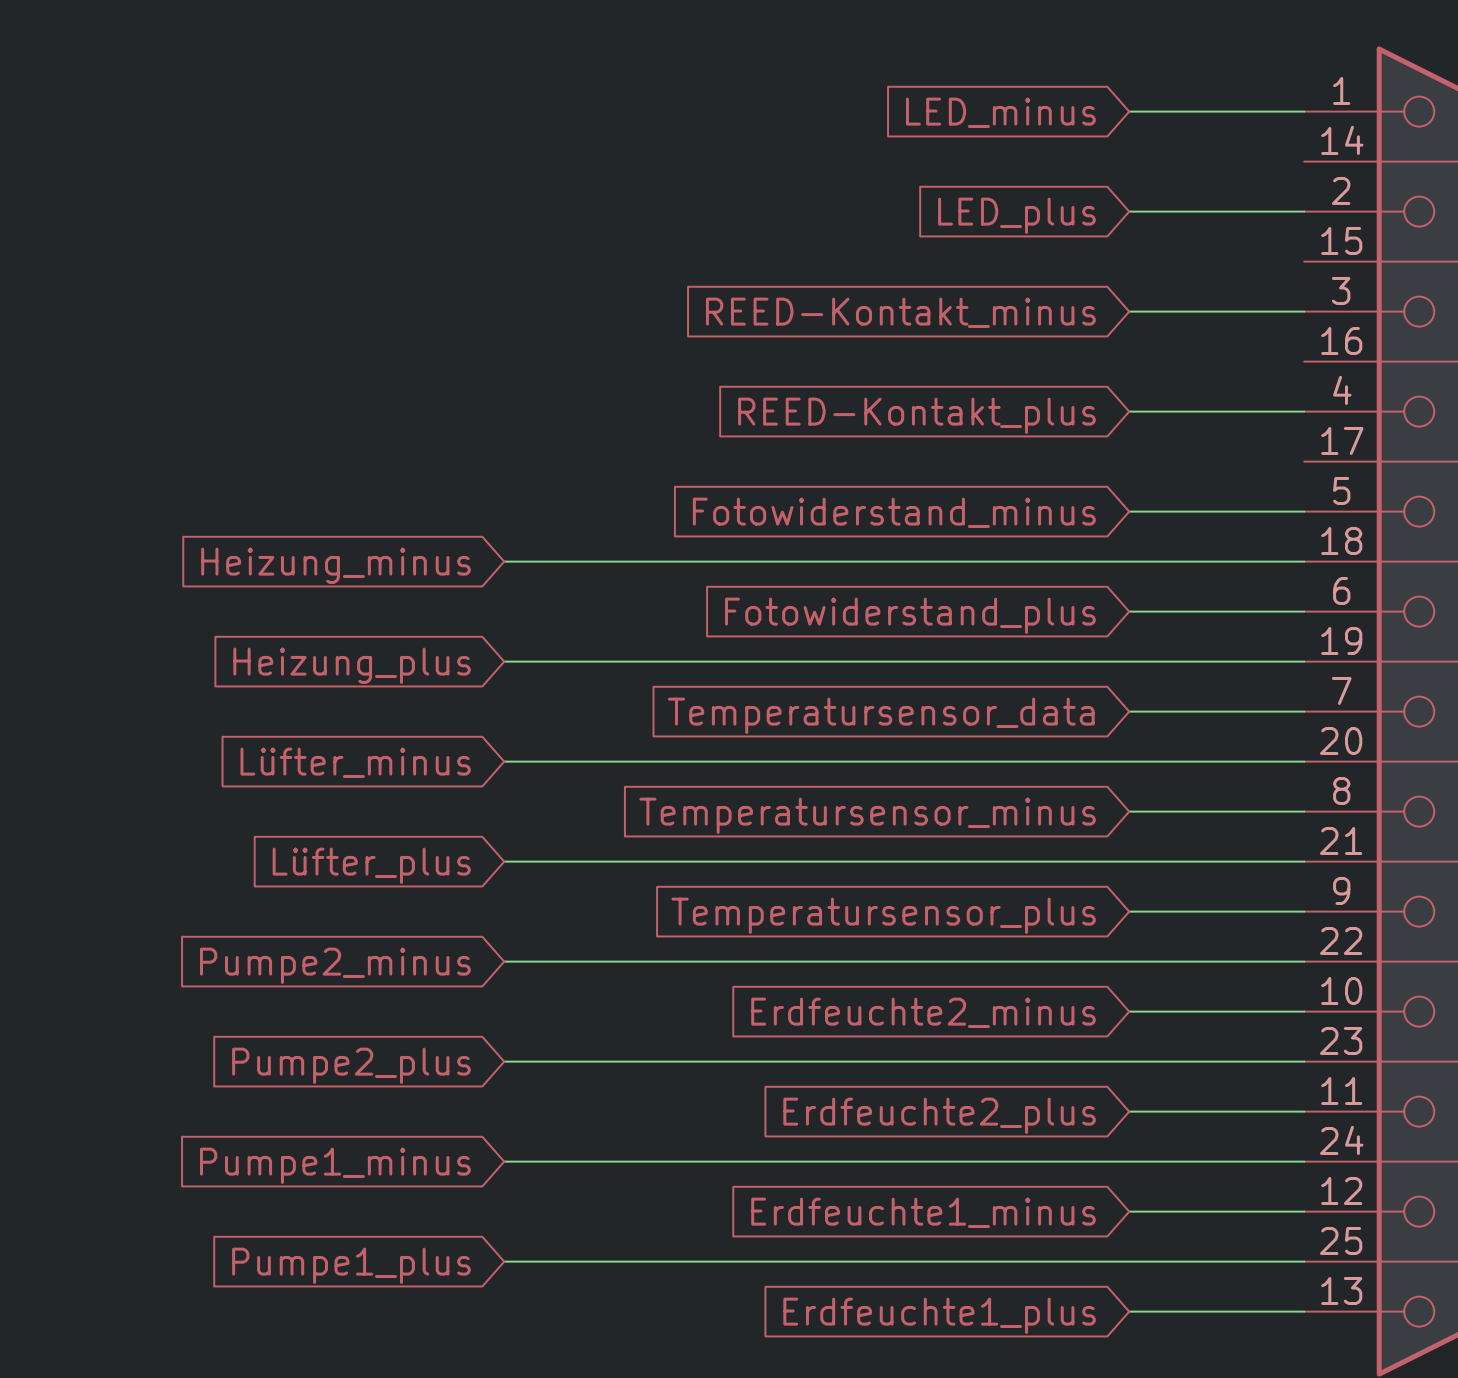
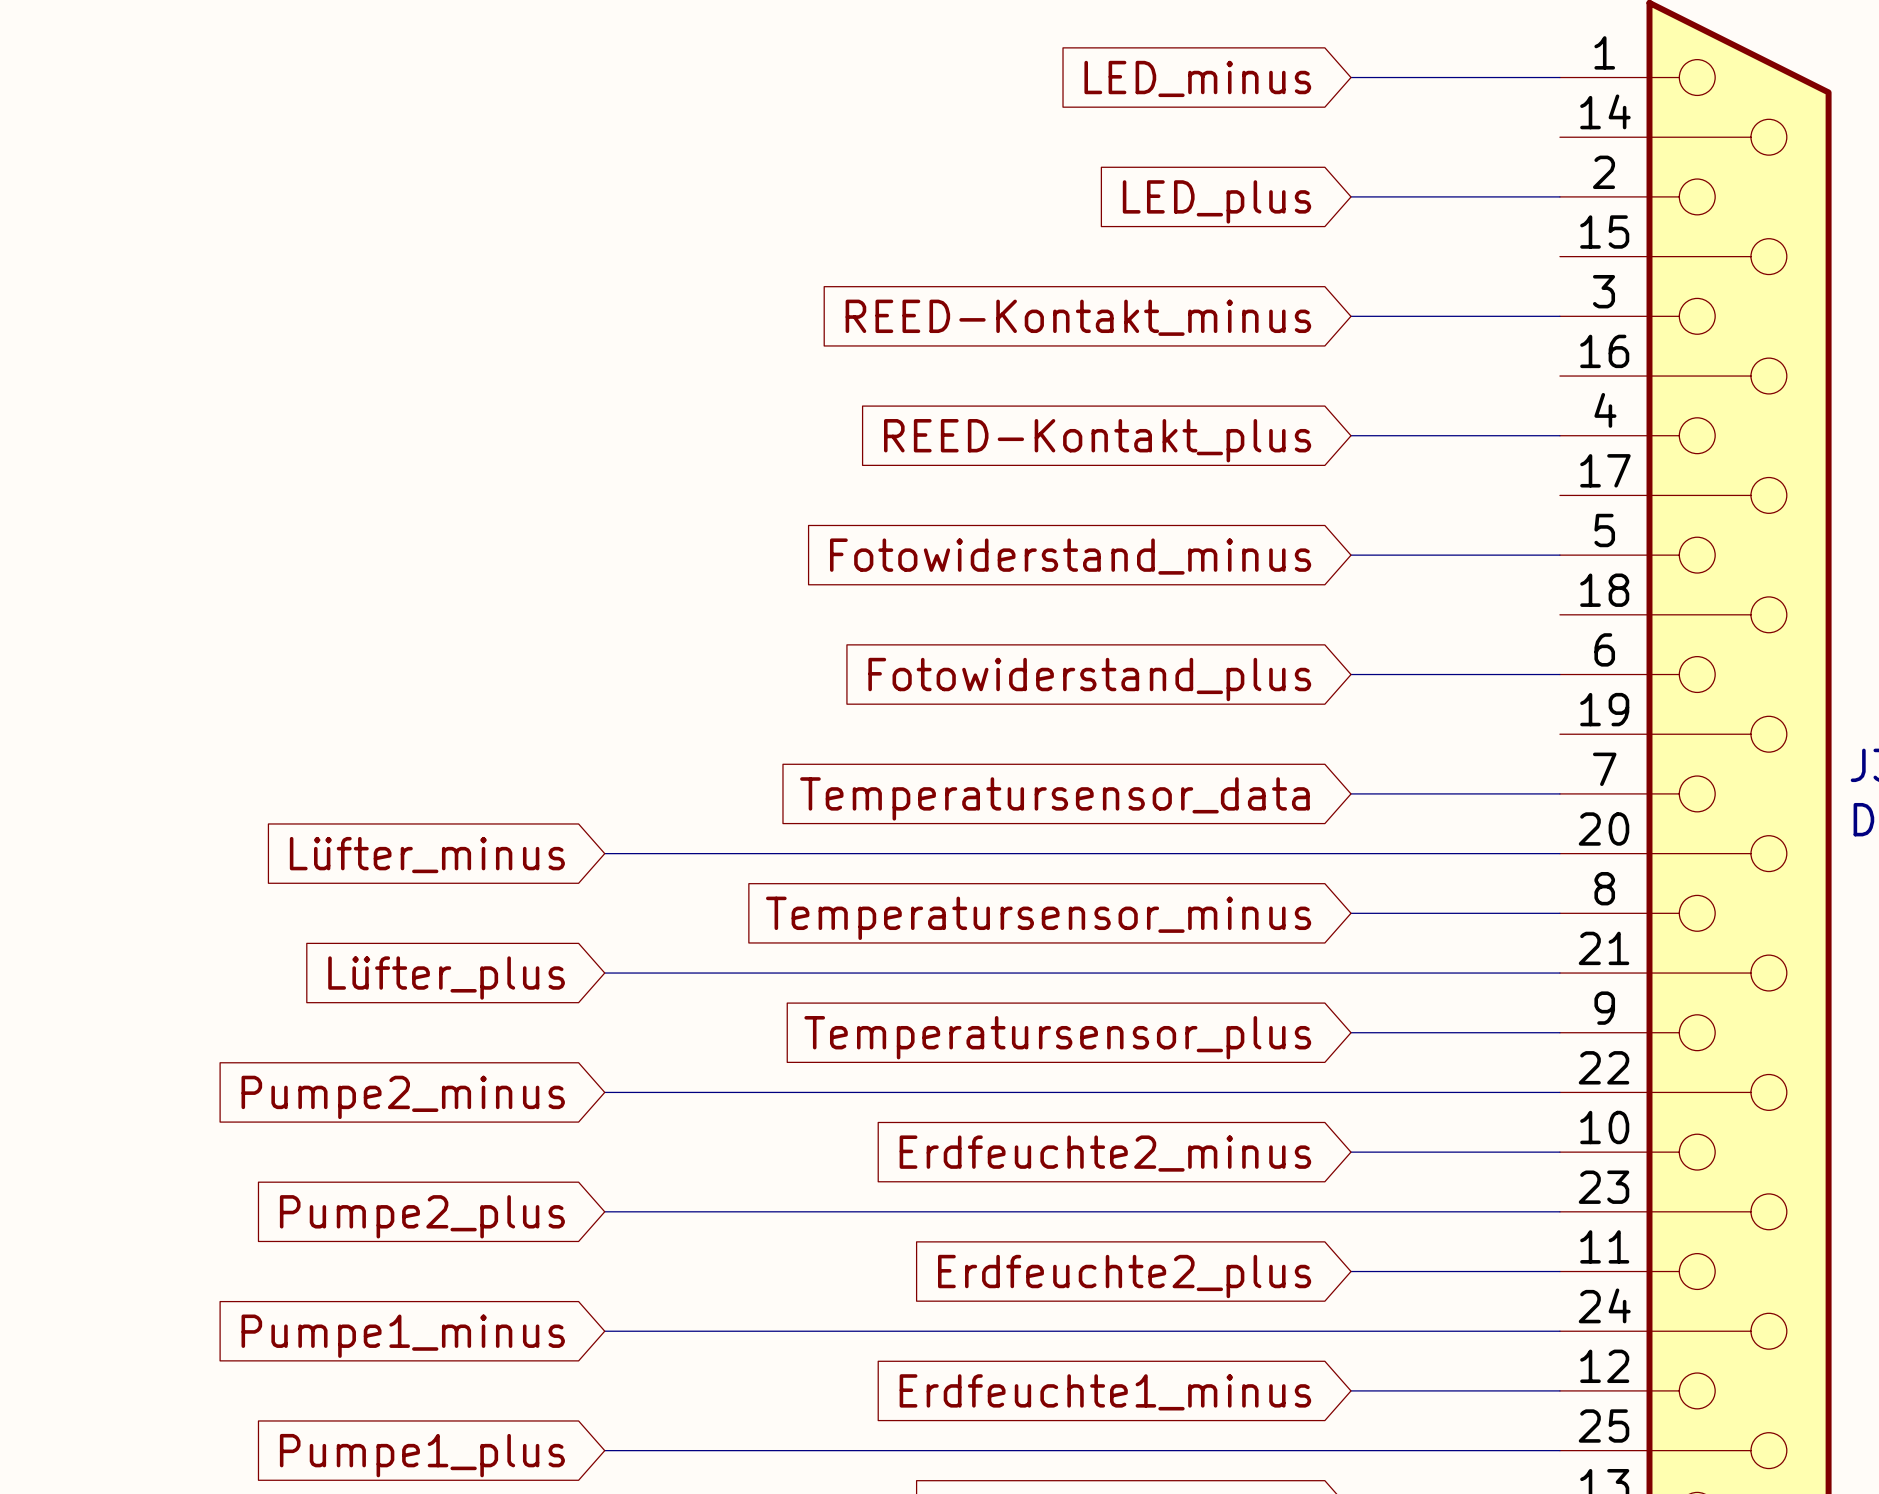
wire: (504, 561) (1304, 561) -> none
global label: Heizung_minus (336, 565) -> none
wire: (504, 661) (1304, 661) -> none
global label: Heizung_plus (352, 665) -> none

